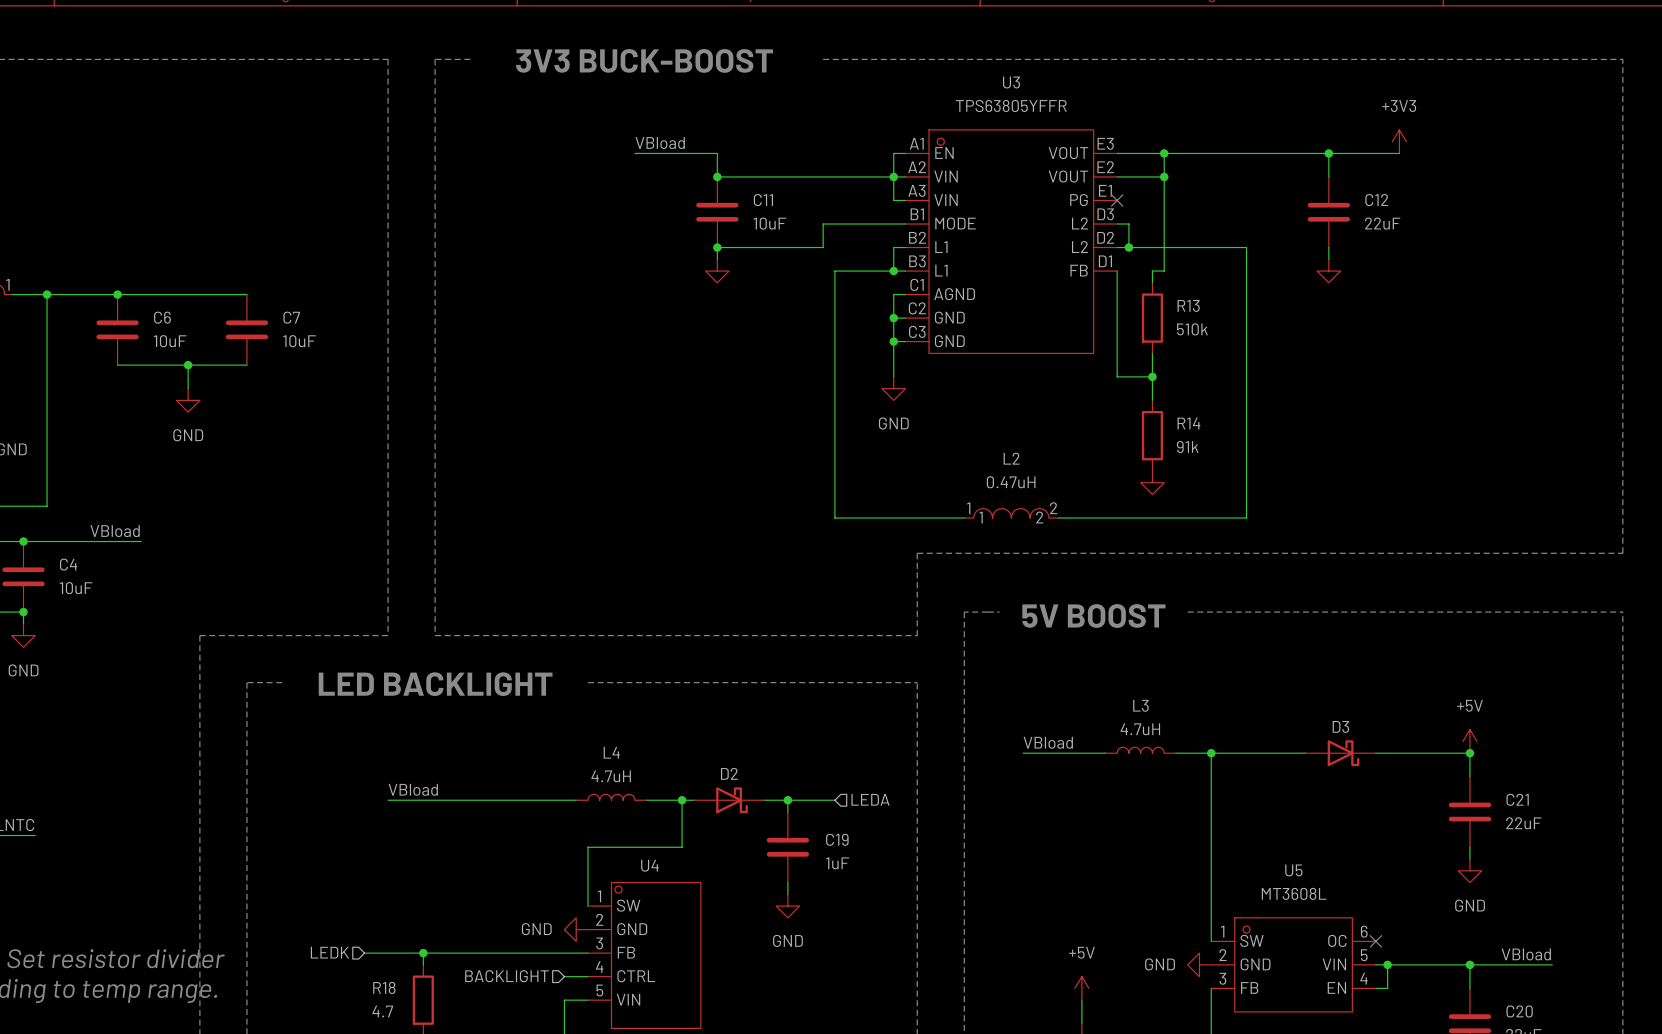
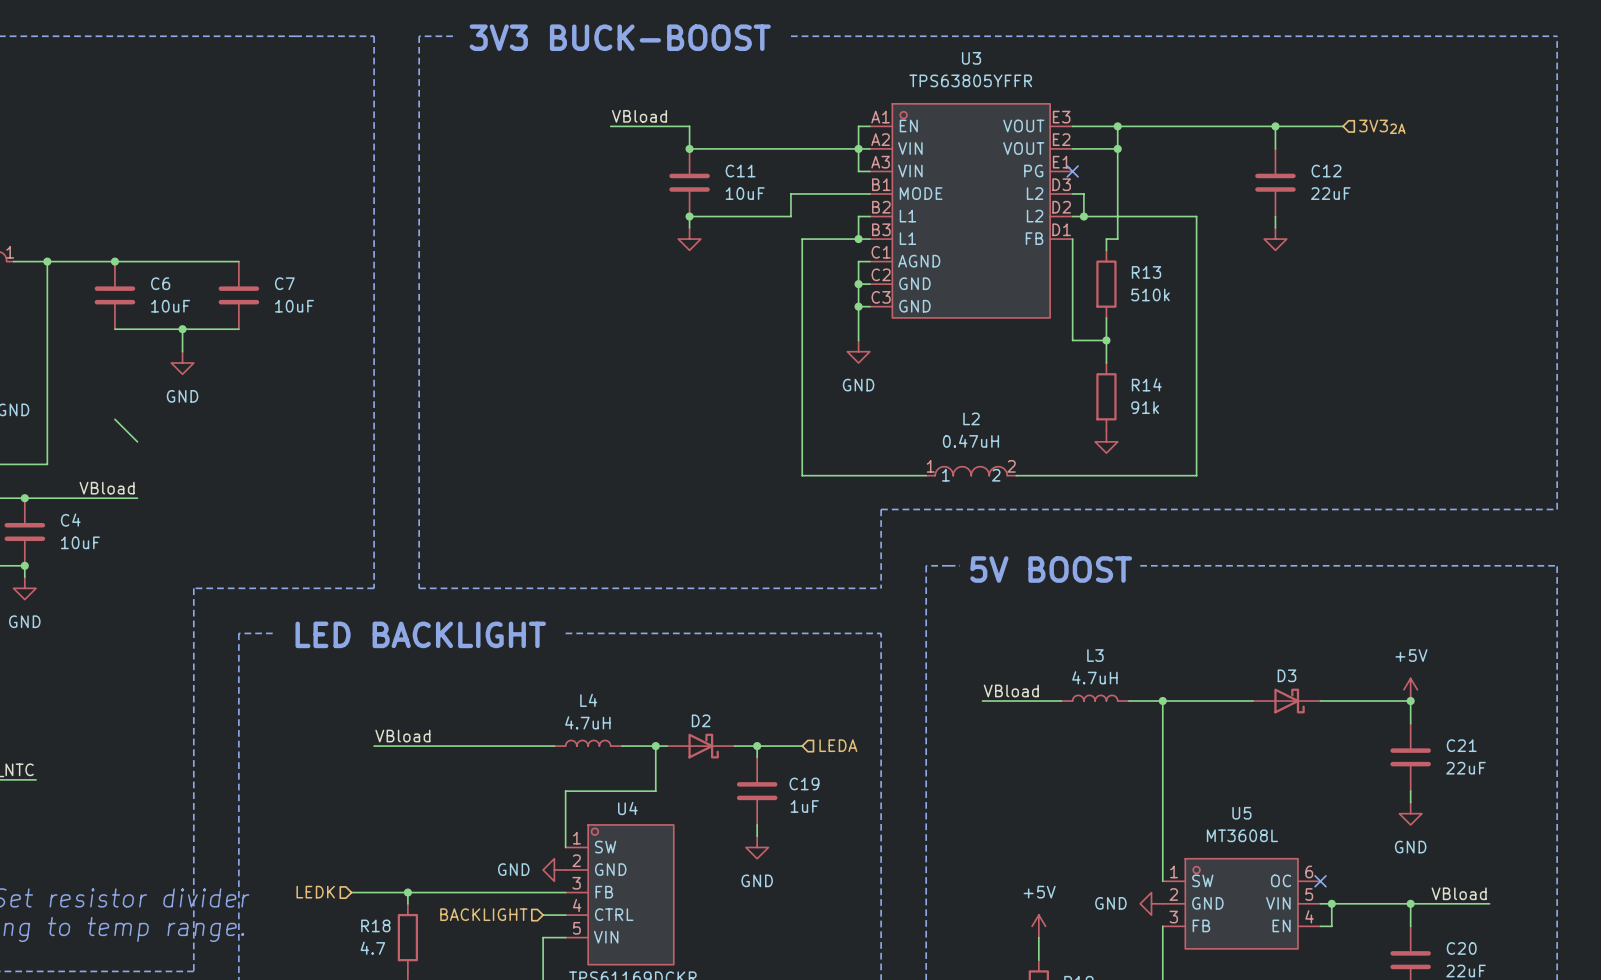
power symbol: +3V3 (1399, 141) -> none
hierarchical label: none -> 3V32A (1382, 126)
wire: none -> (114, 419) (137, 441)

